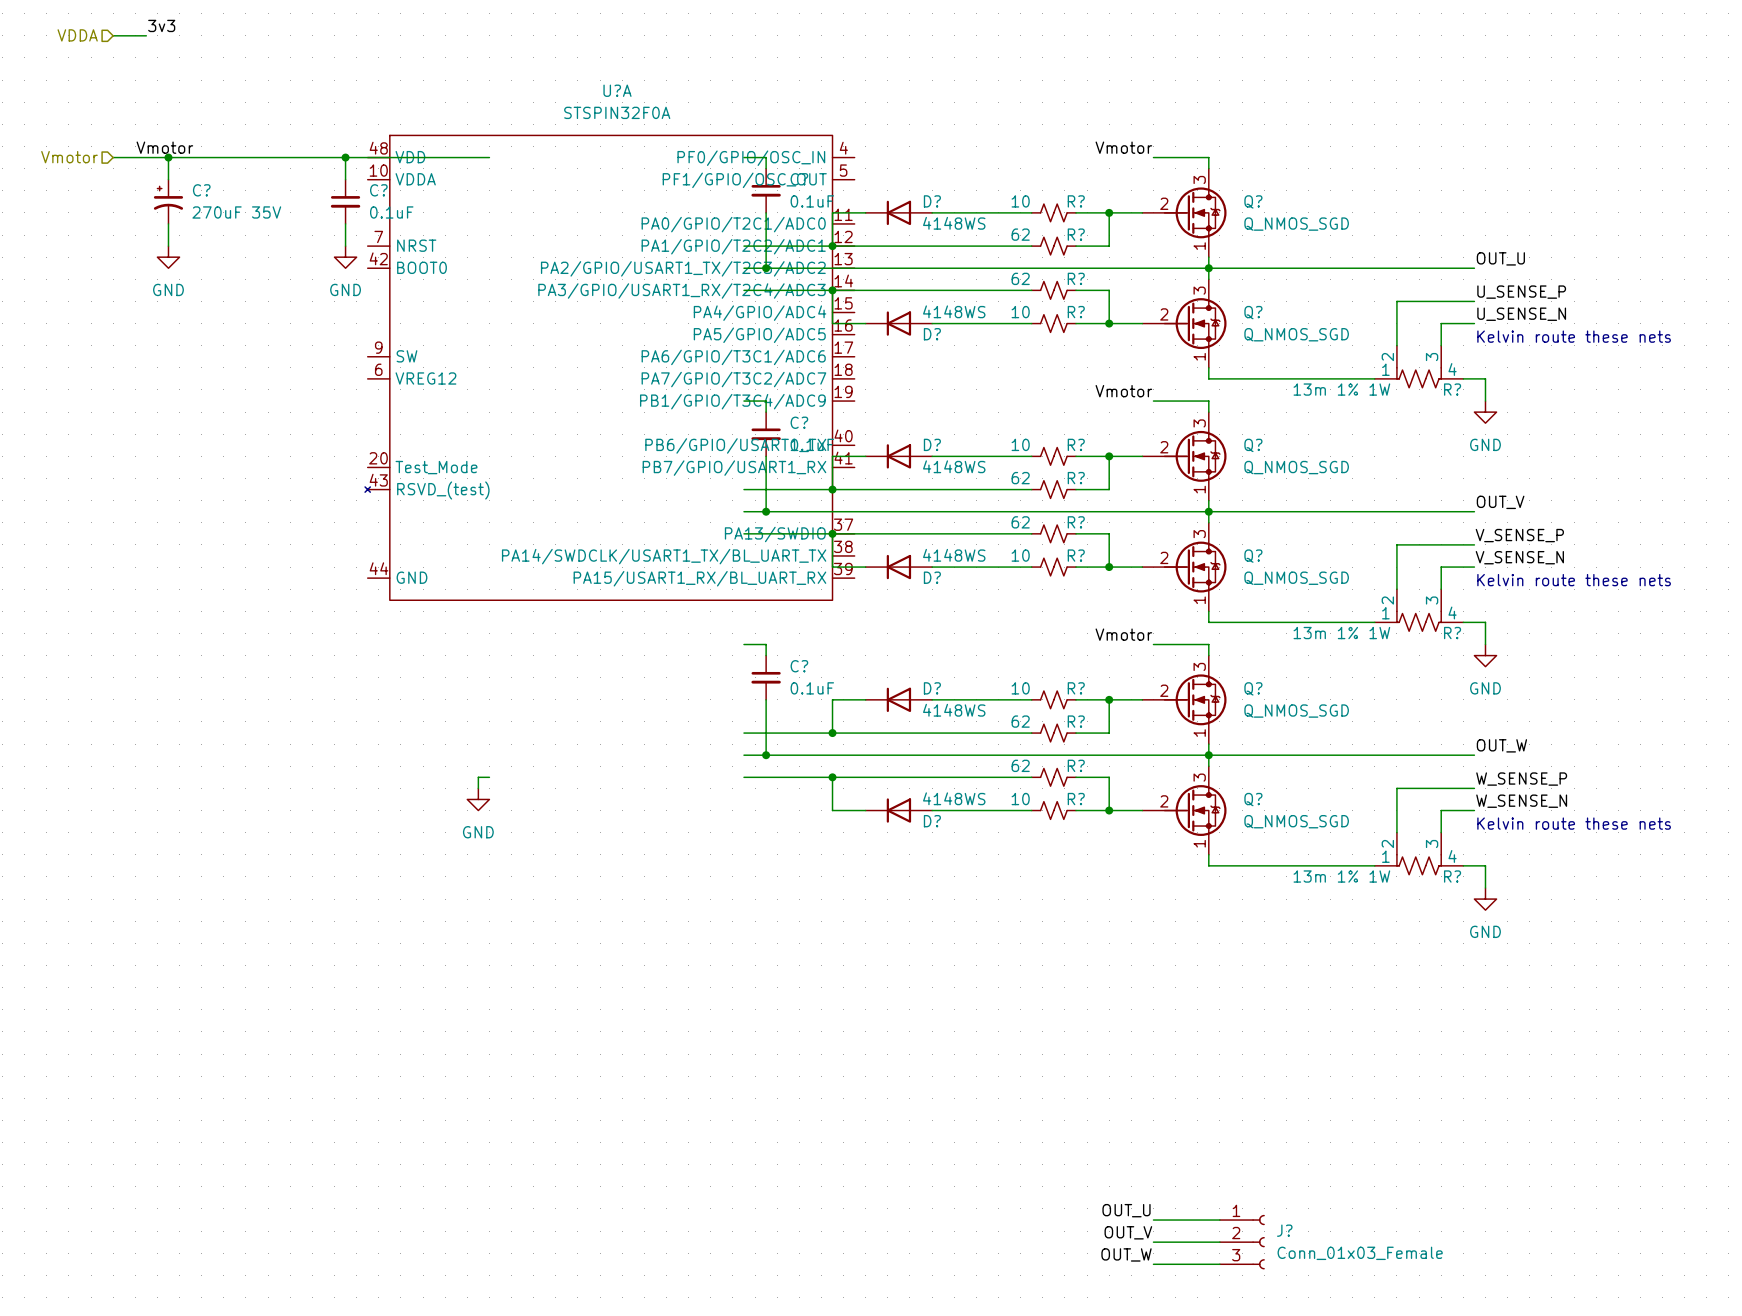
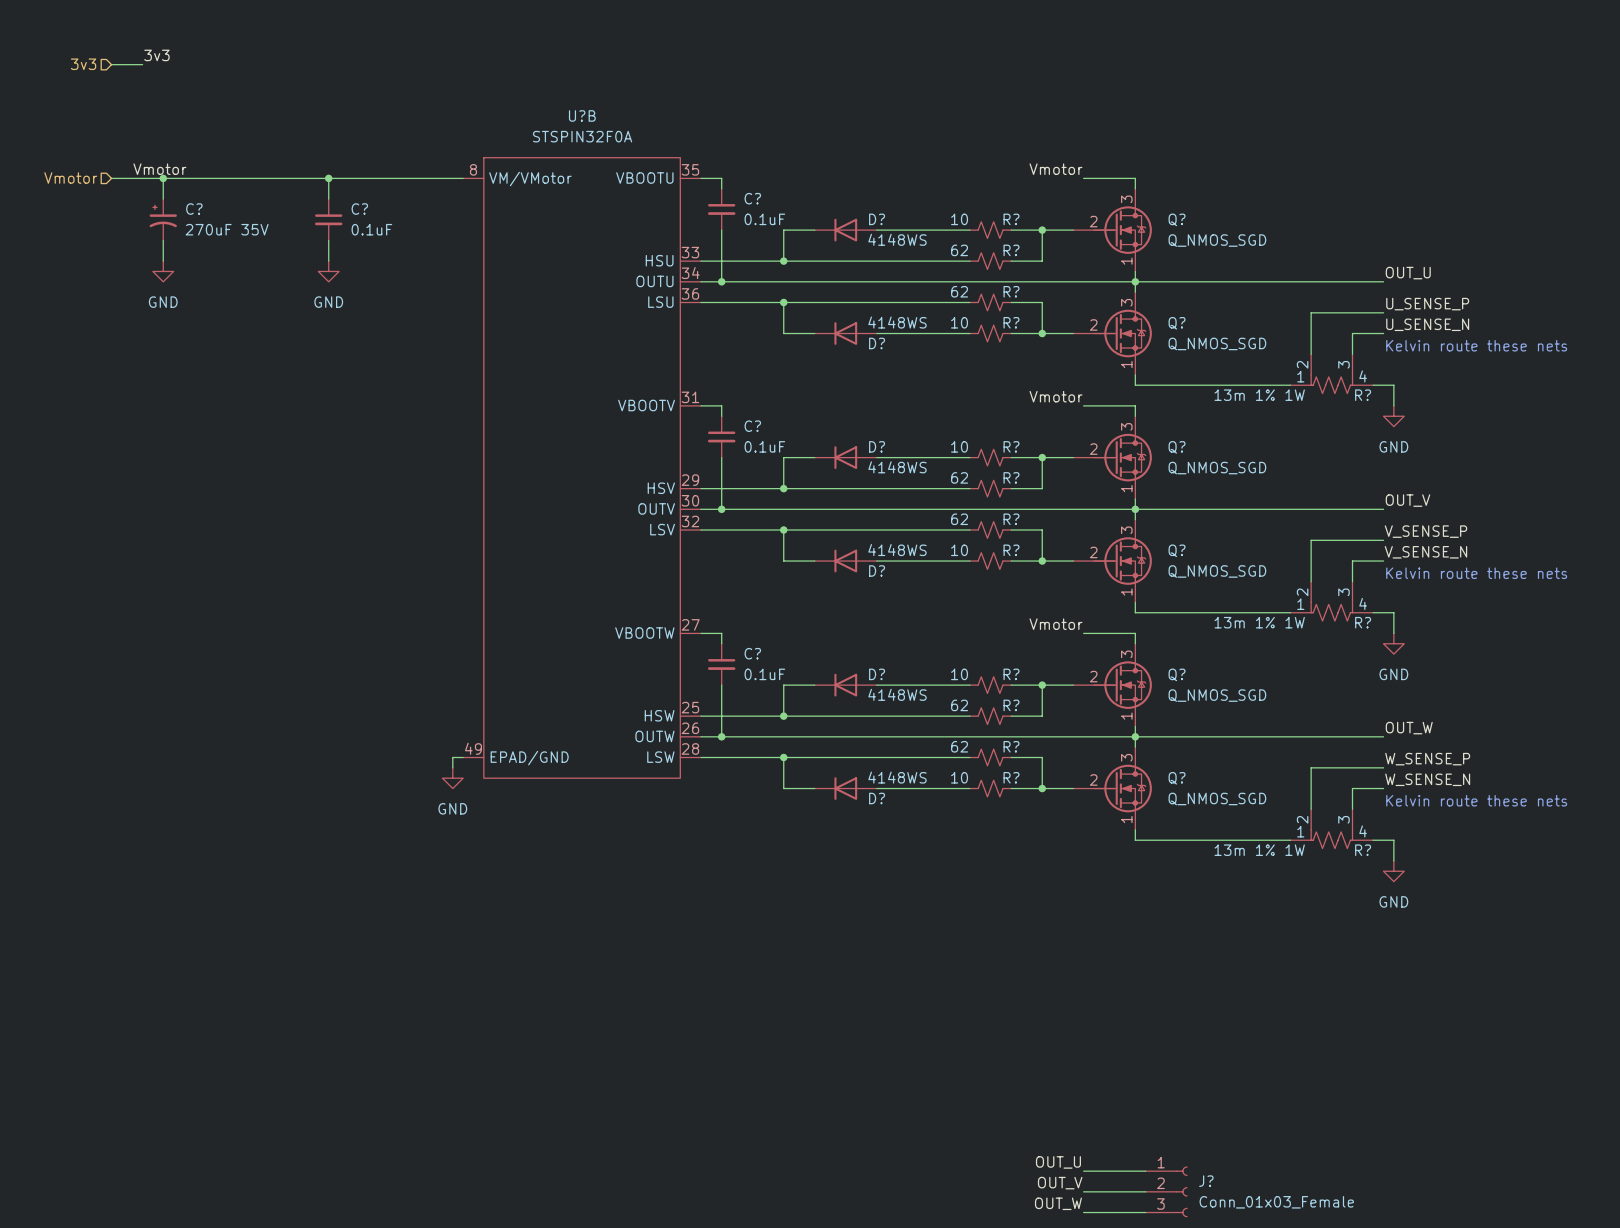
hierarchical label: VDDA (77, 35) -> 3v3 (83, 64)
U?A: STSPIN32F0A (609, 367) -> none
U?B: none -> STSPIN32F0A (582, 467)

